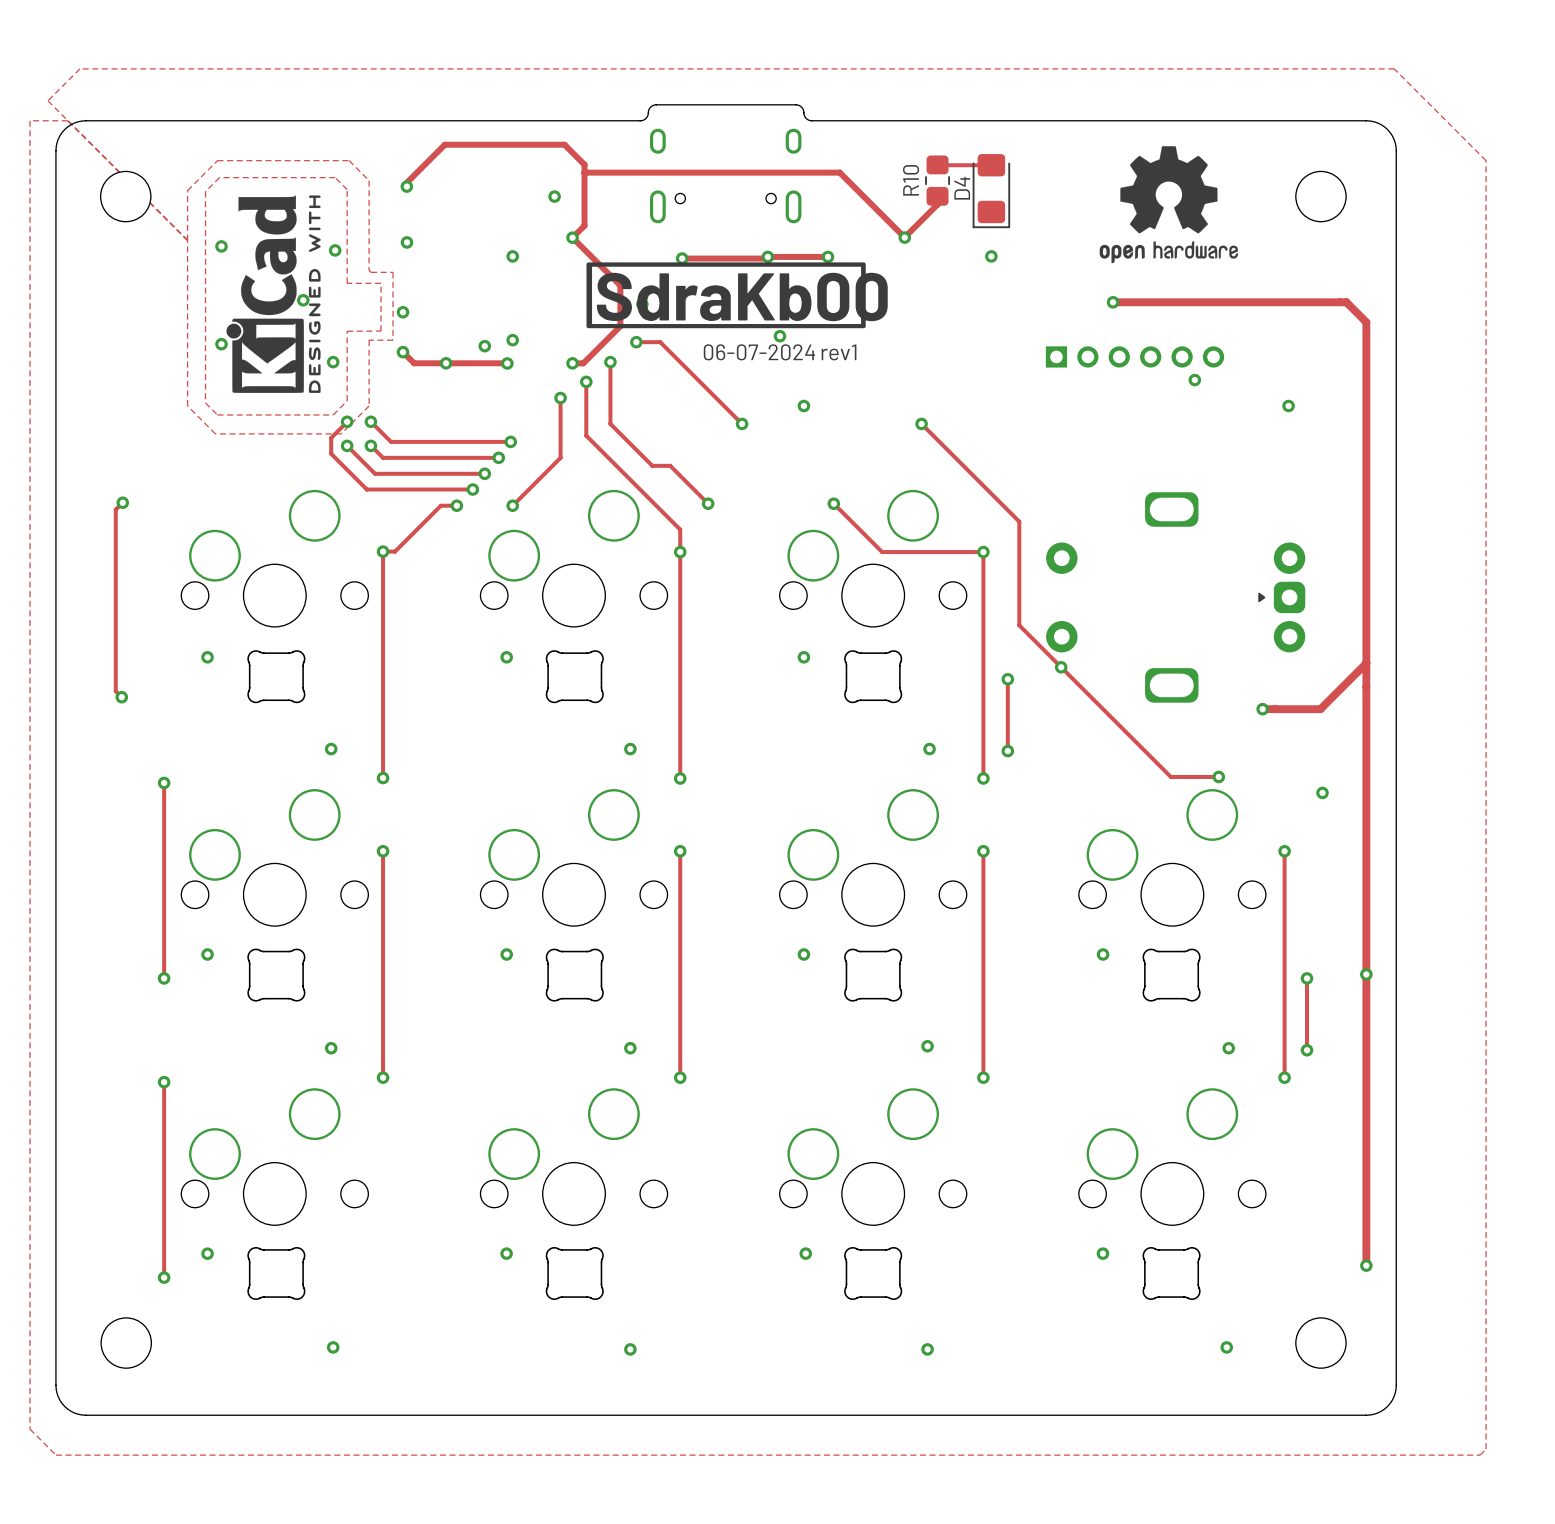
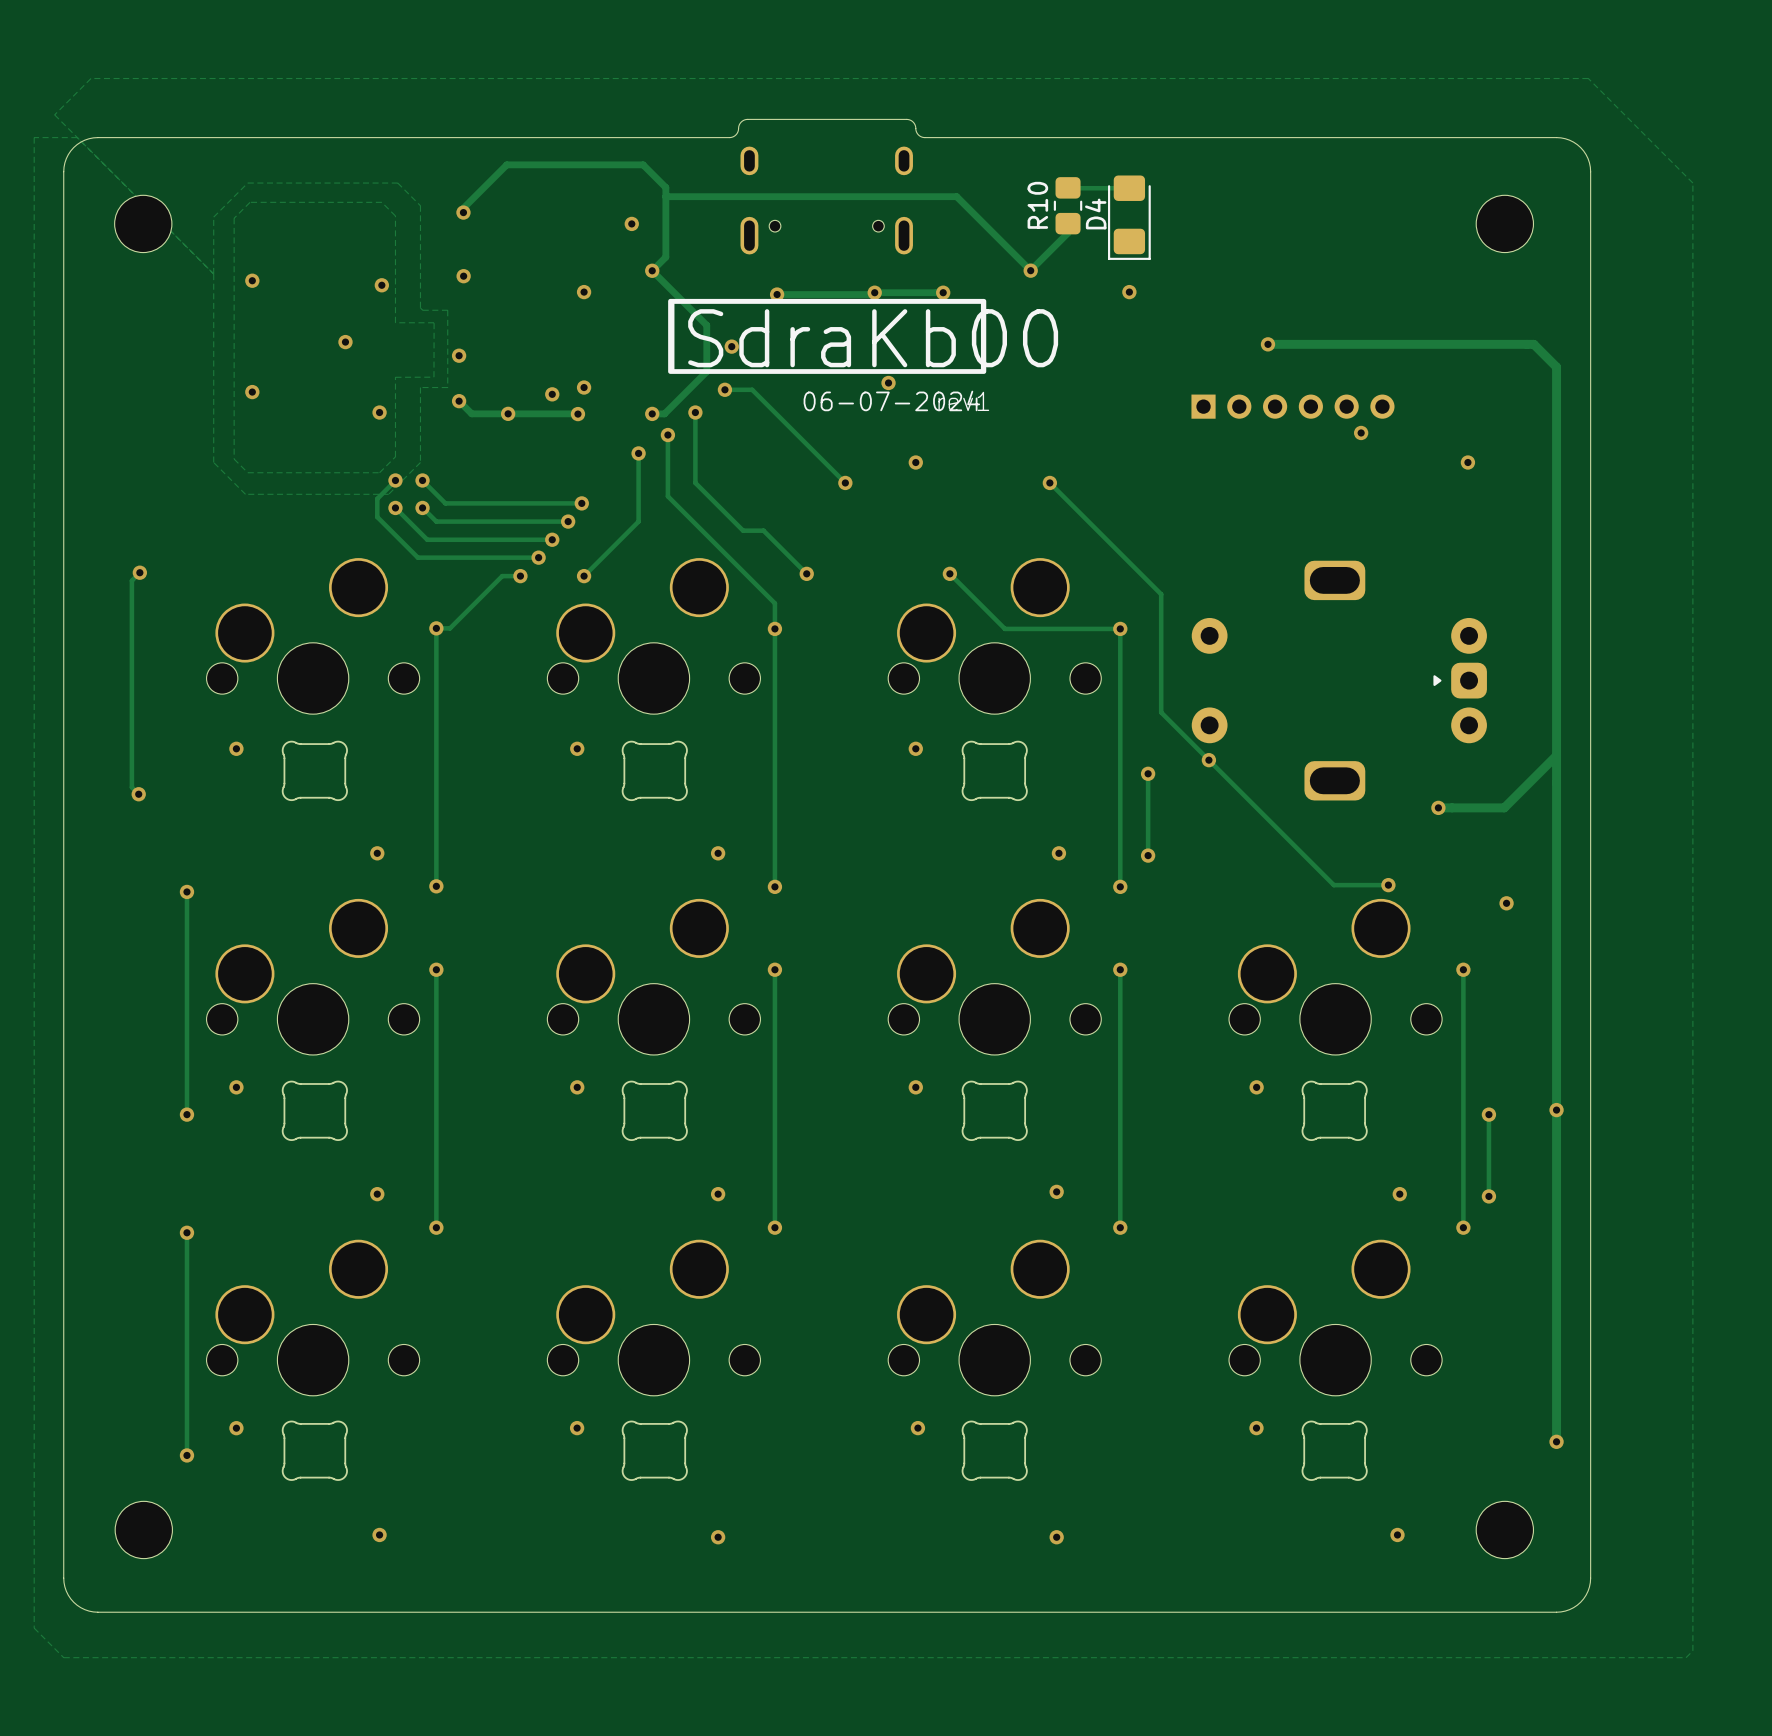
drawing: [1099, 146, 1239, 264] -> none
drawing: [226, 195, 321, 393] -> none

